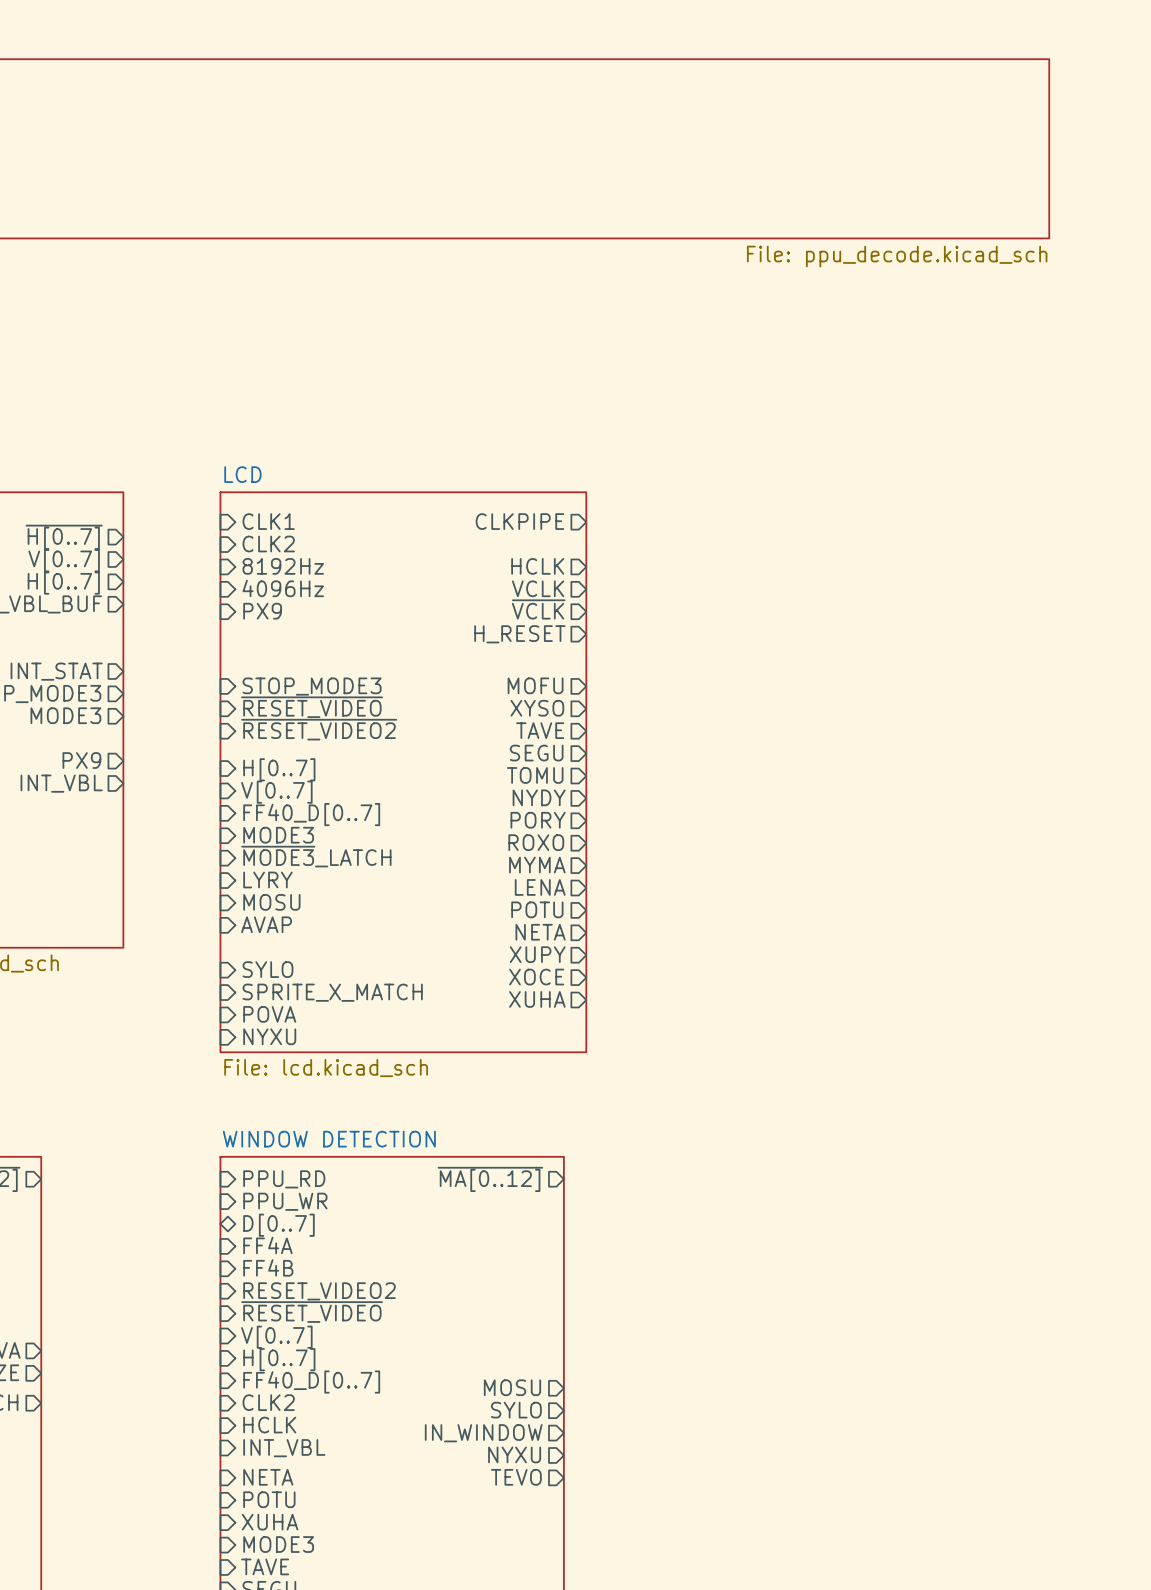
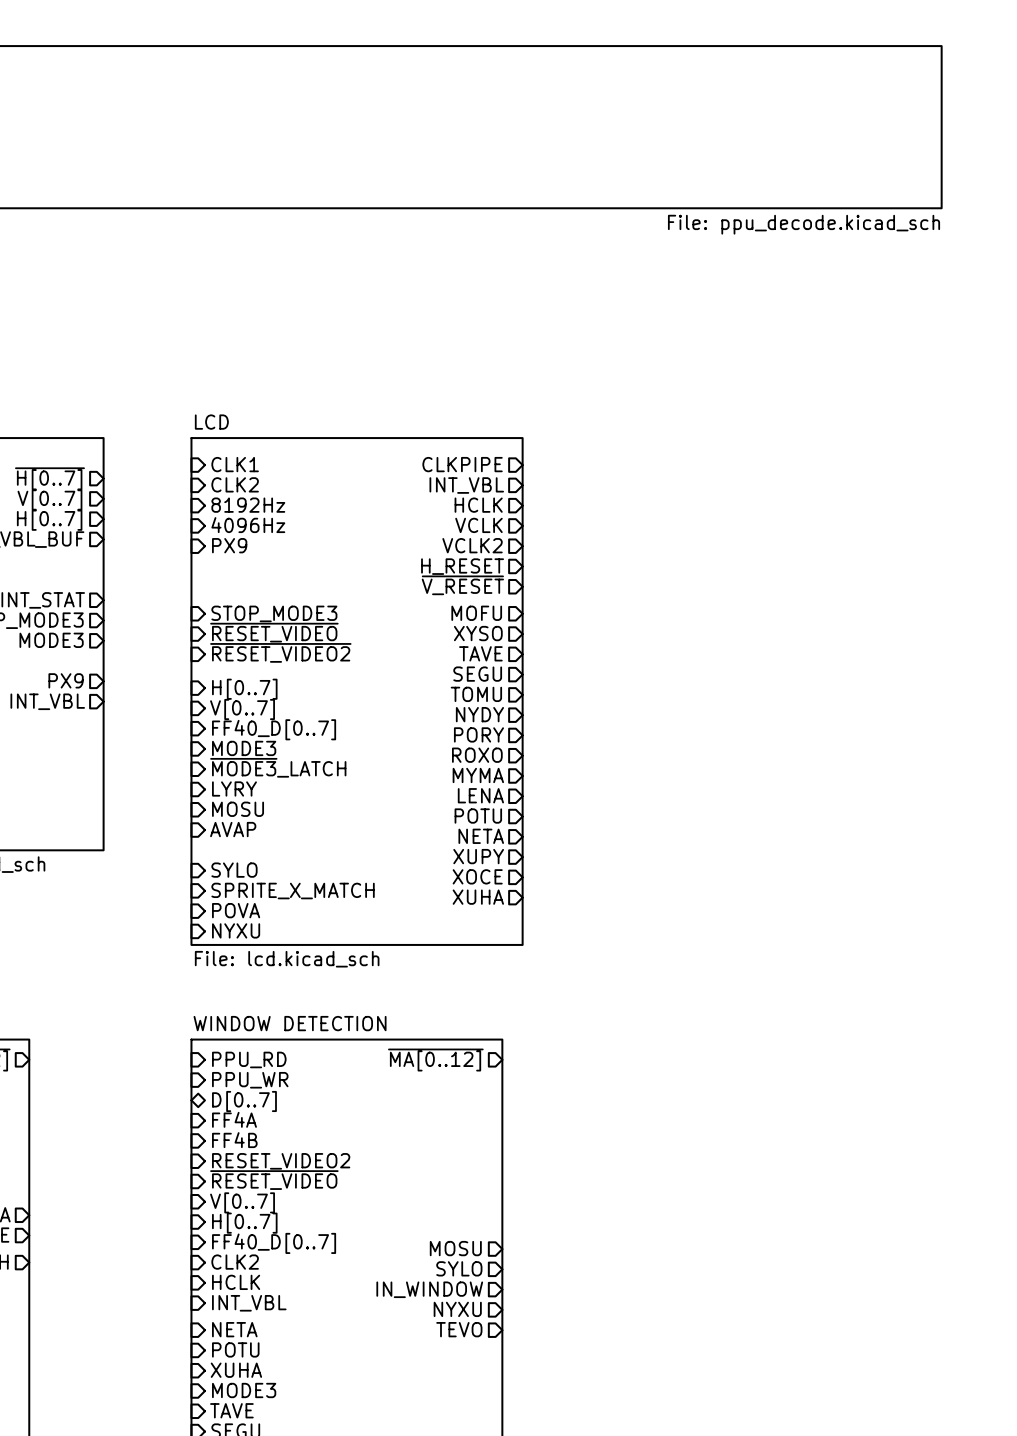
sheet pin: none -> INT_VBL (466, 485)
sheet pin: ~{VCLK} (538, 609) -> VCLK2 (472, 545)
sheet pin: none -> ~{V_RESET} (462, 585)

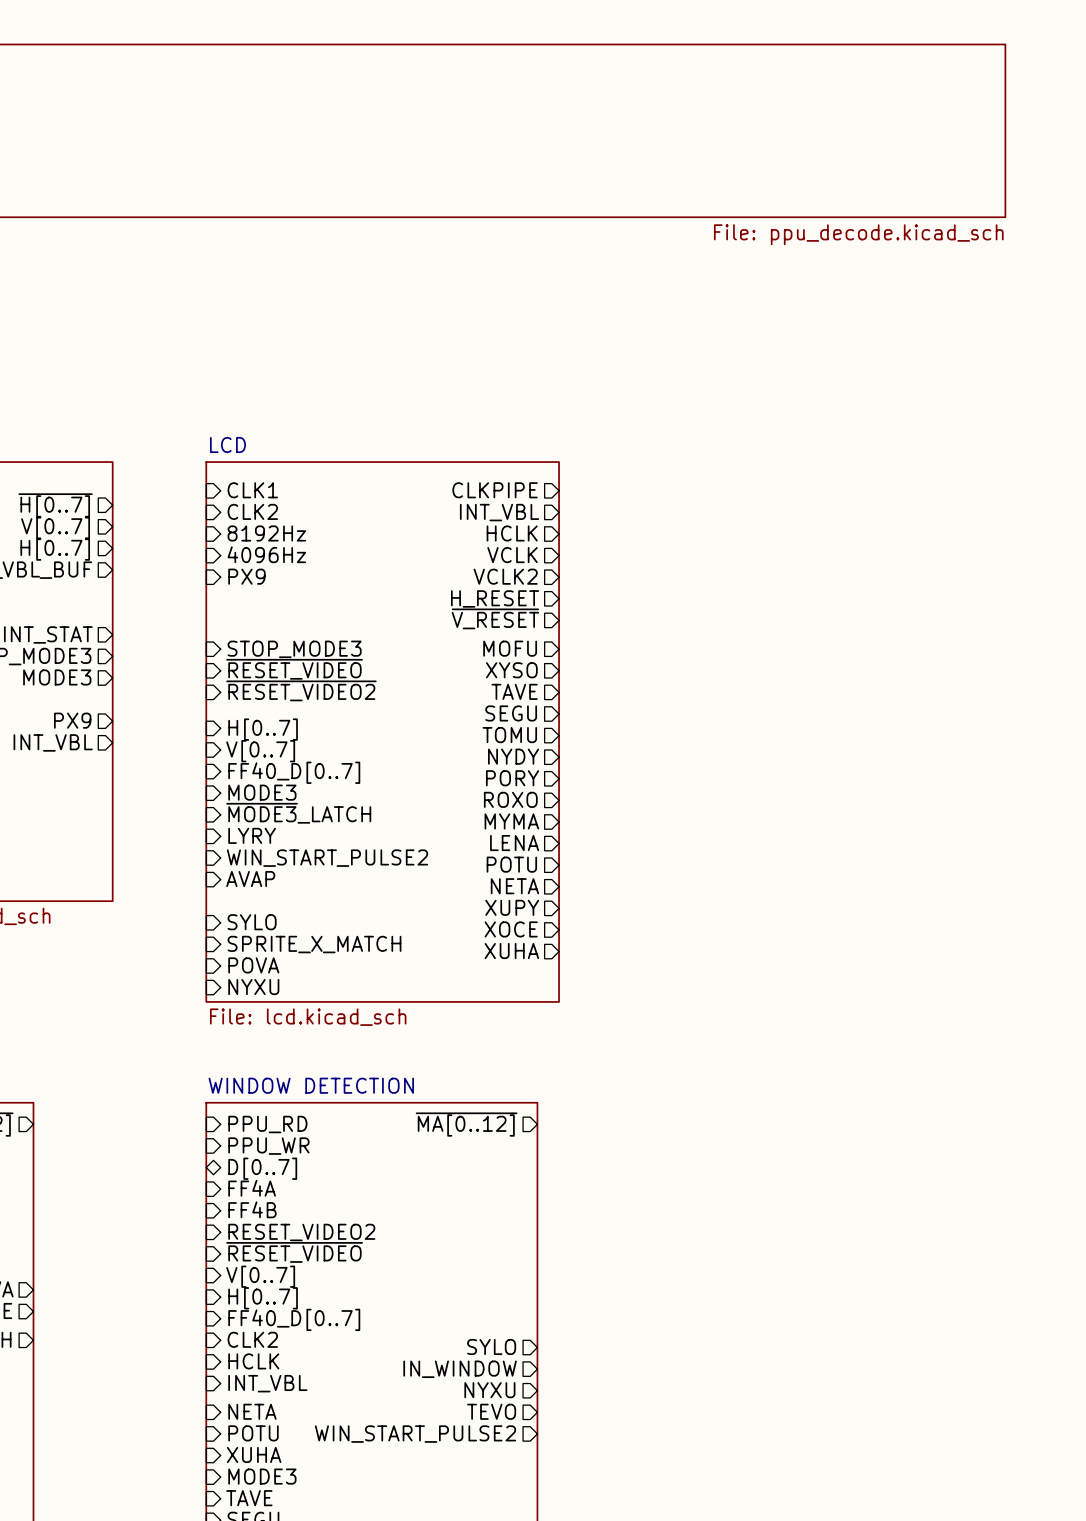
sheet pin: MOSU (238, 809) -> WIN_START_PULSE2 (327, 858)
sheet pin: MOSU (455, 1248) -> none
sheet pin: none -> WIN_START_PULSE2 (415, 1434)

